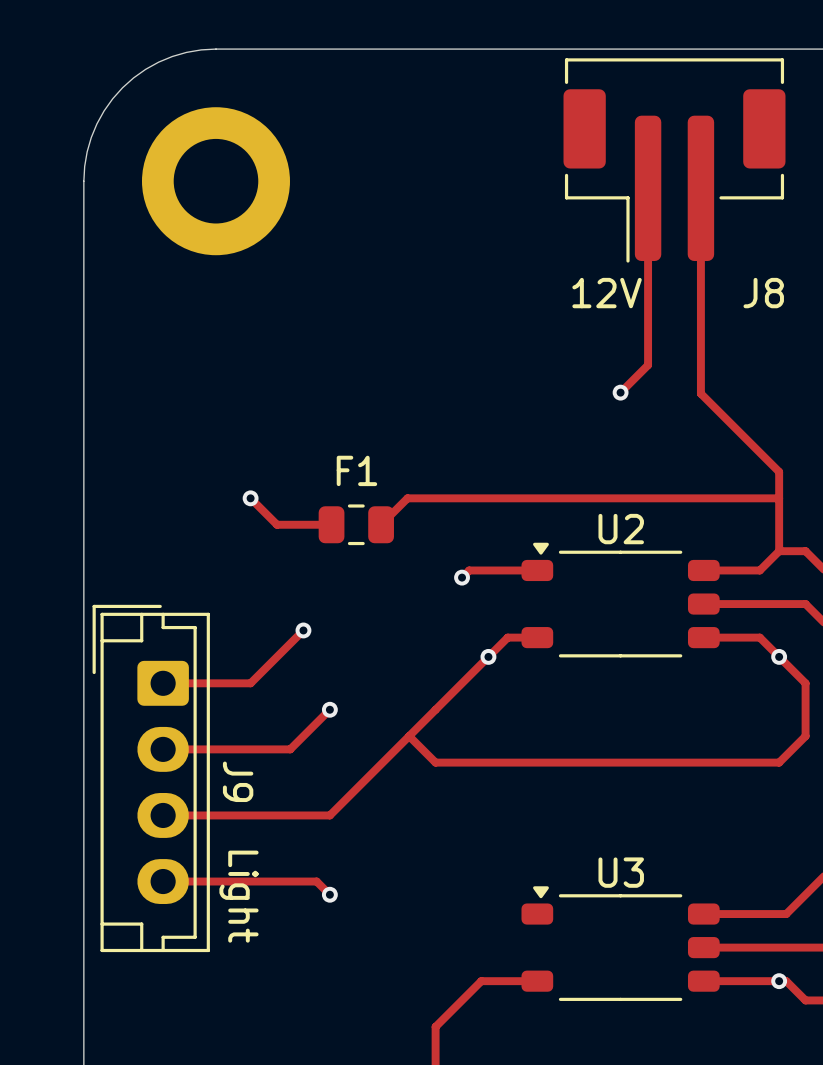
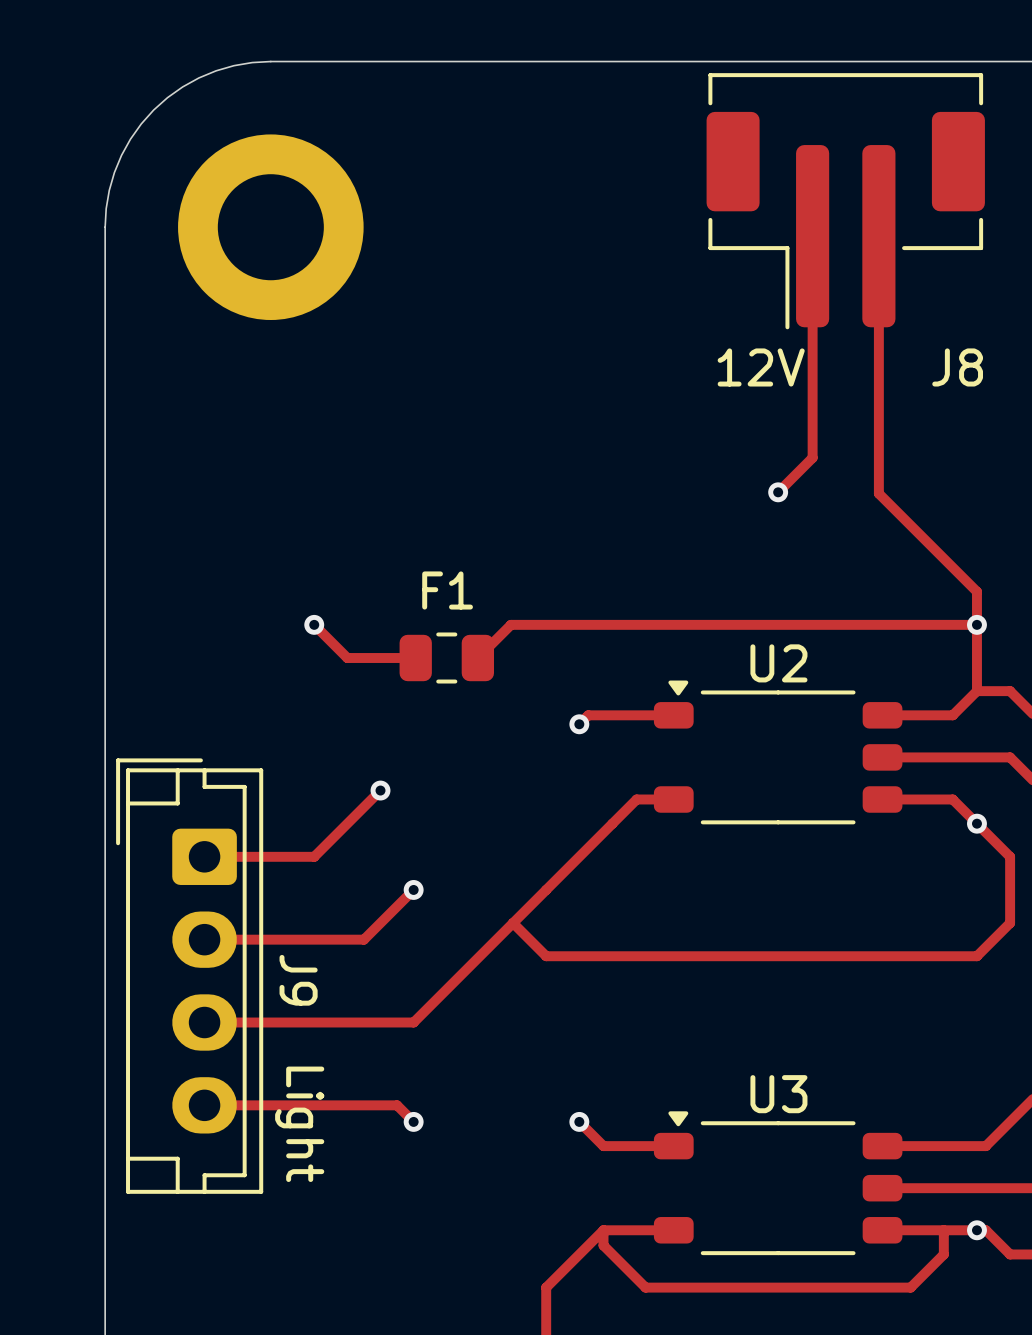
via: none -> (976, 624)
via: (488, 656) -> none
track: none -> (579, 1121) (603, 1146) (673, 1146)
via: none -> (579, 1121)
track: none -> (603, 1230) (603, 1245) (645, 1287) (910, 1287) (943, 1254) (943, 1230)

